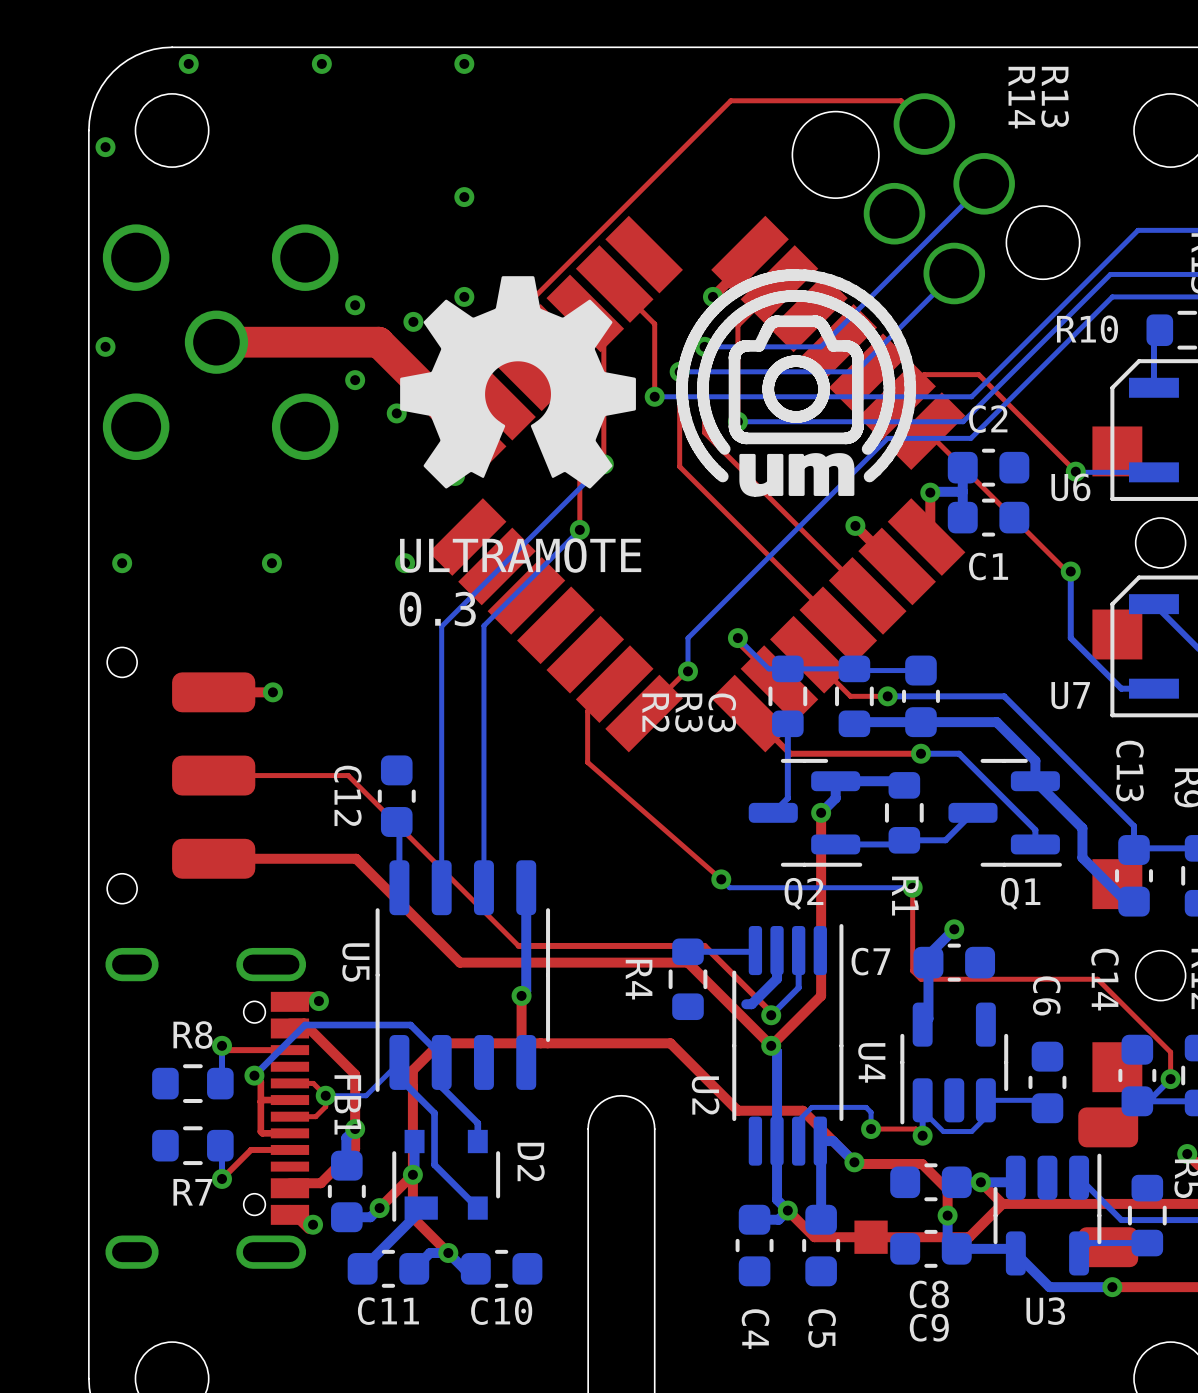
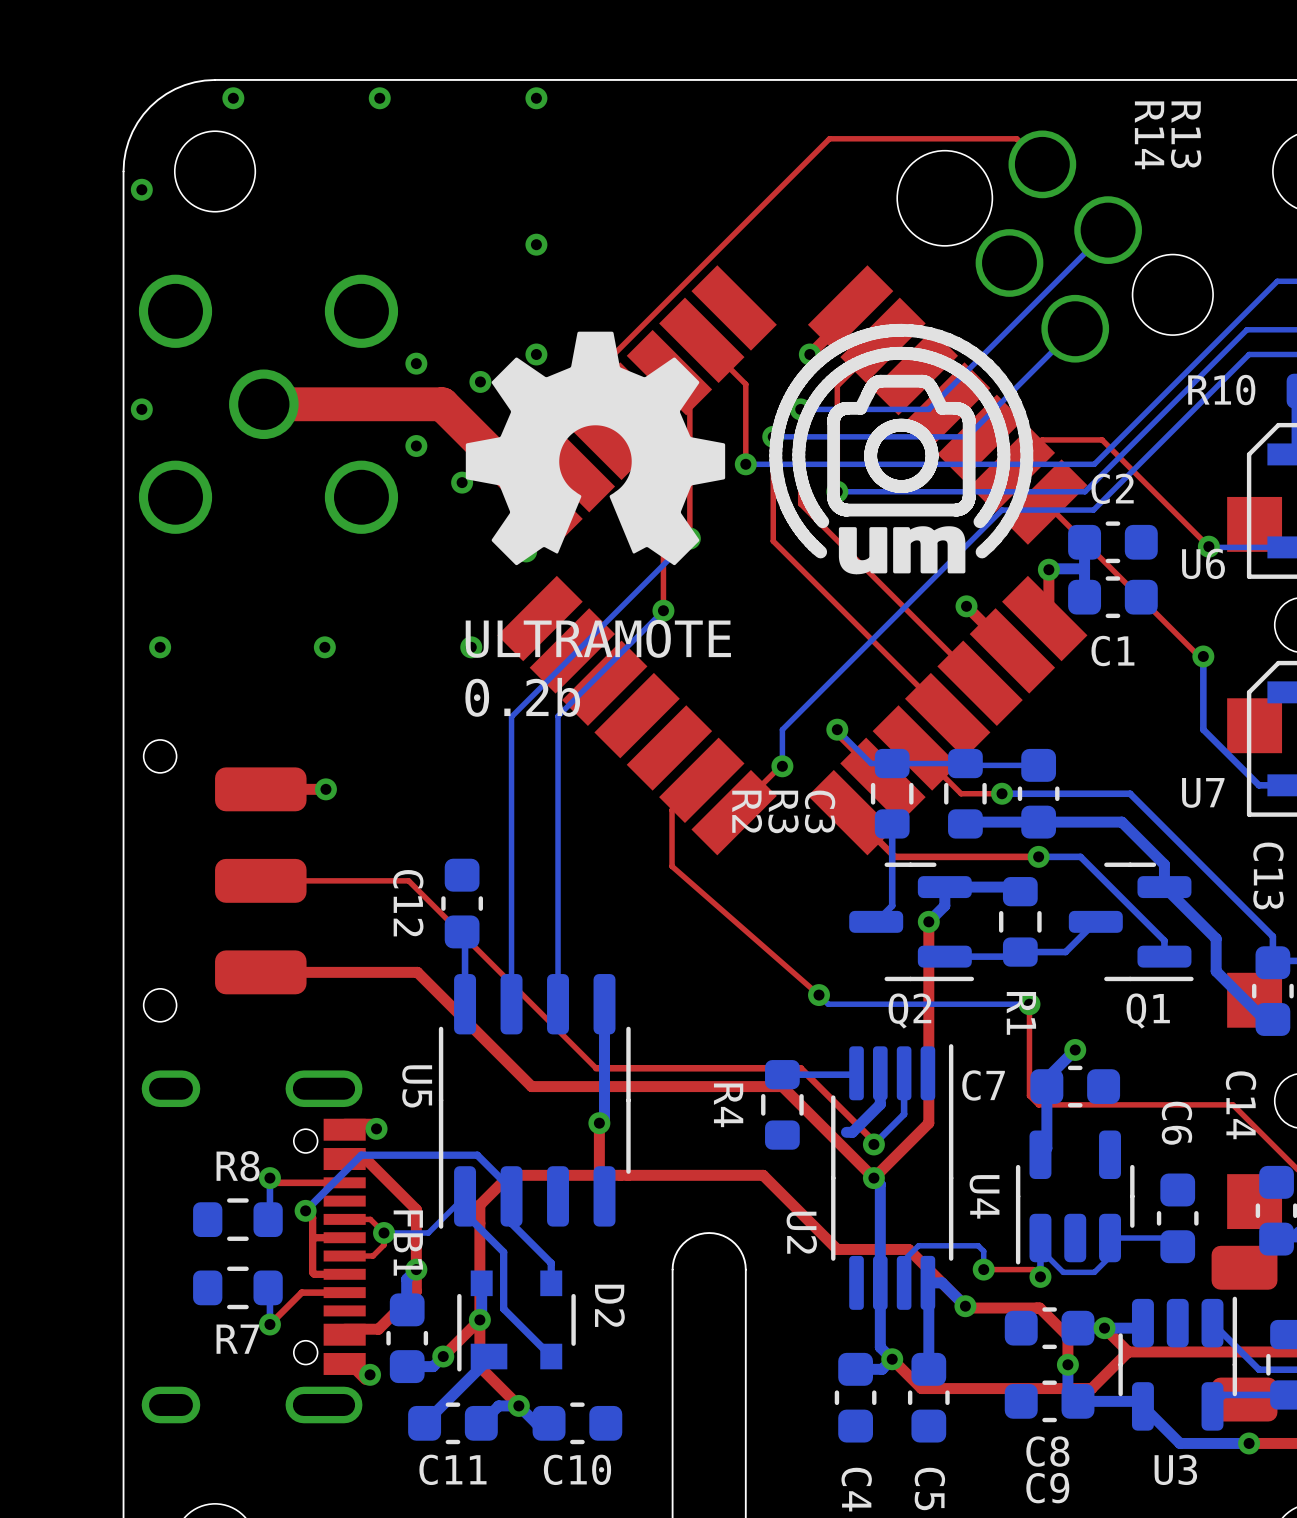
text: 0.3 (437, 609) -> 0.2b (522, 697)
part: (871, 1237) -> none

